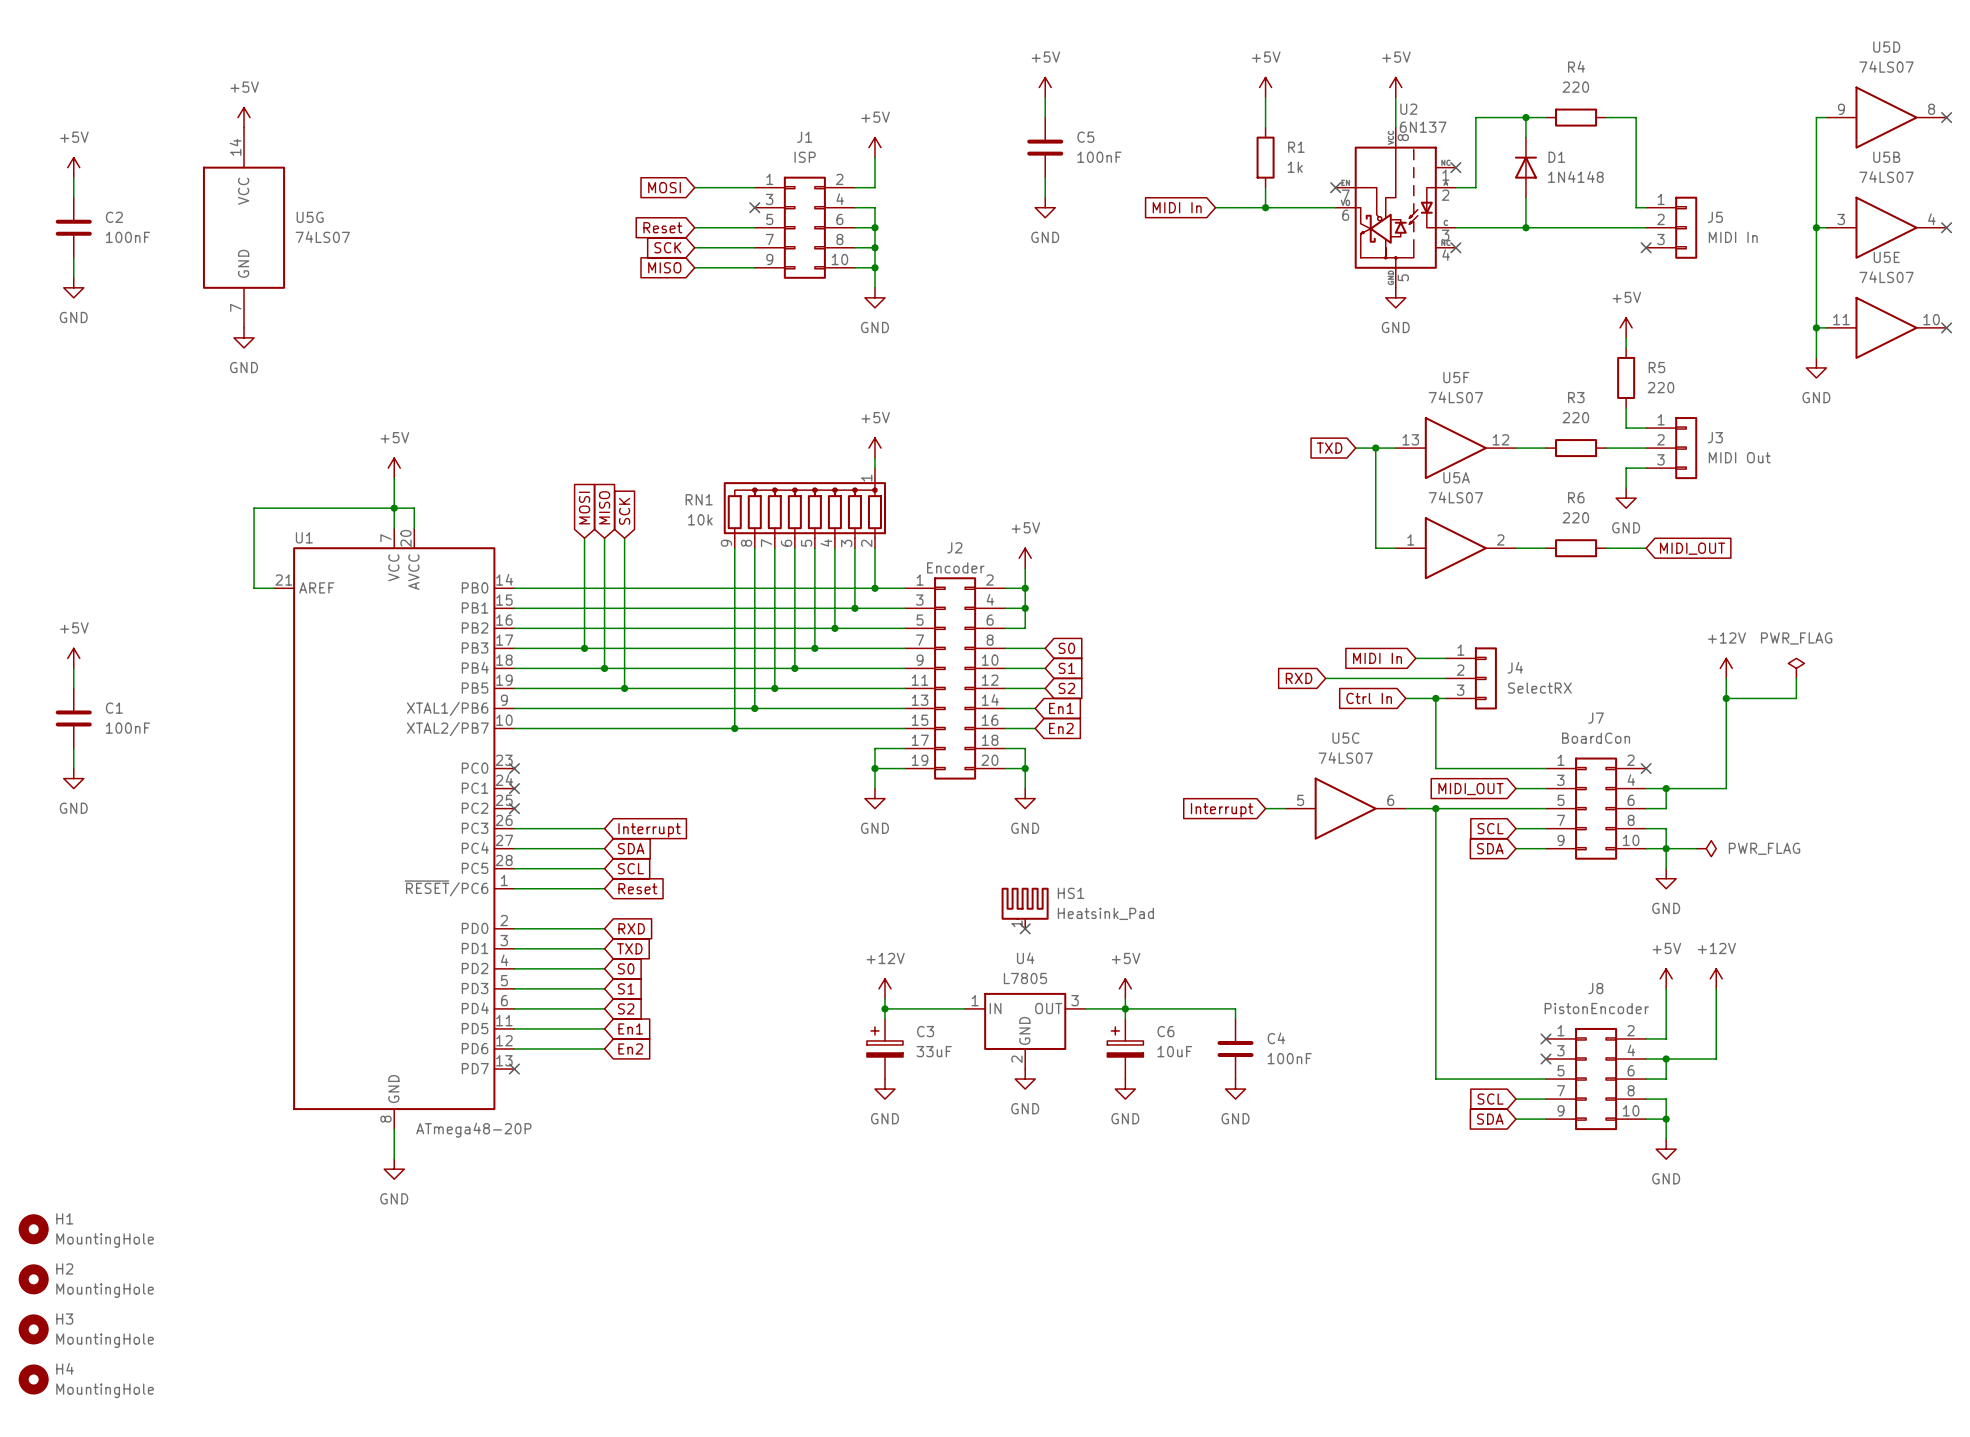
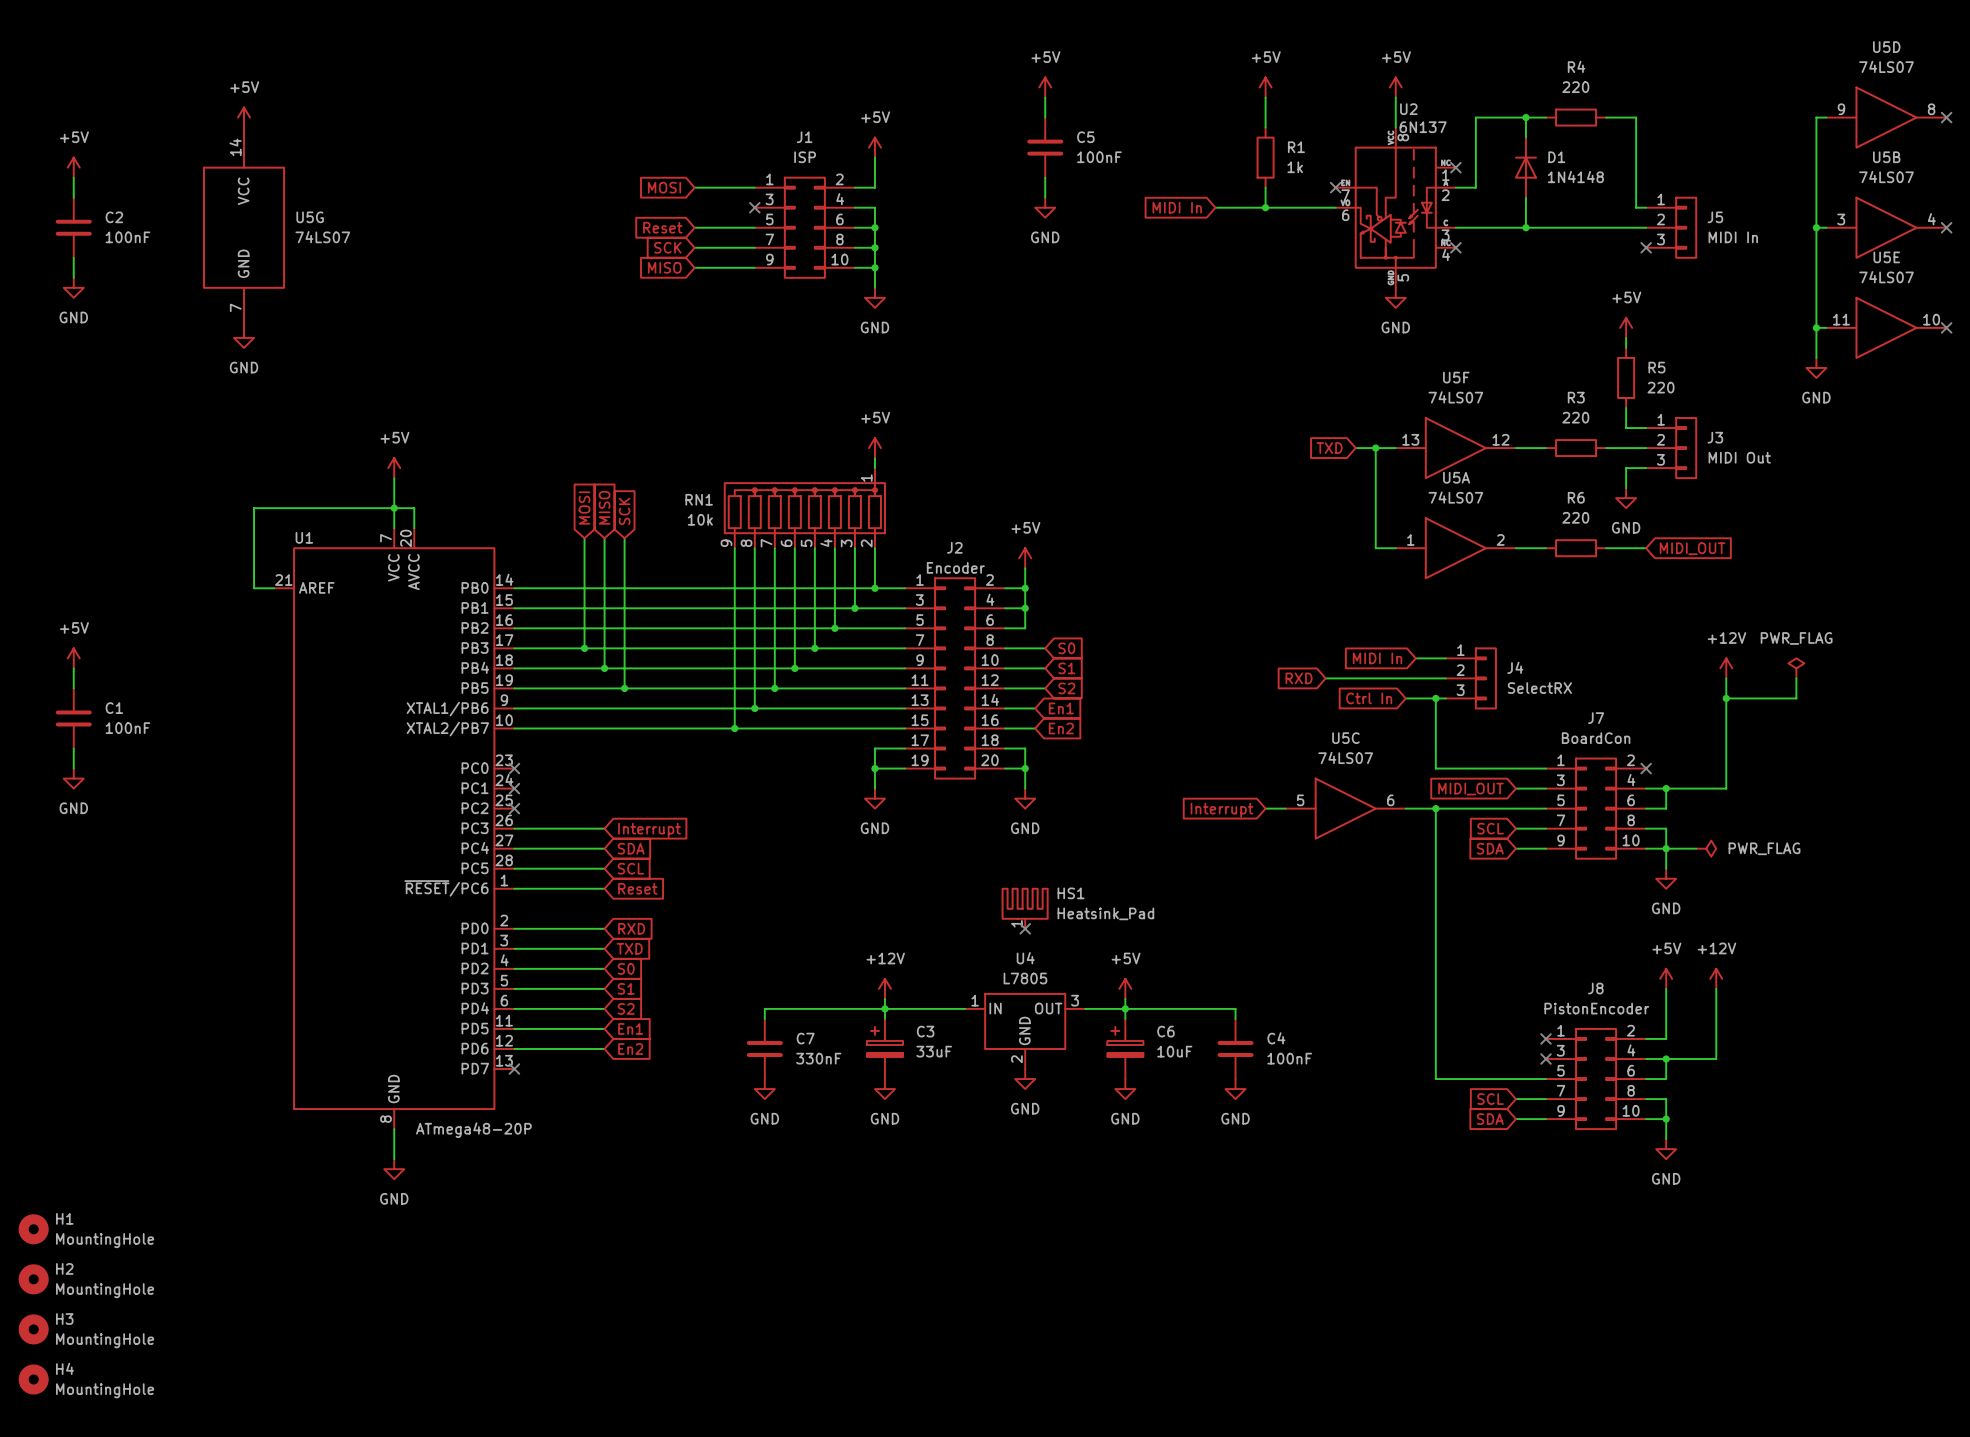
wire: none -> (884, 1008) (764, 1008) (764, 1018)
C7: none -> 330nF (764, 1048)
power symbol: none -> GND (764, 1089)

